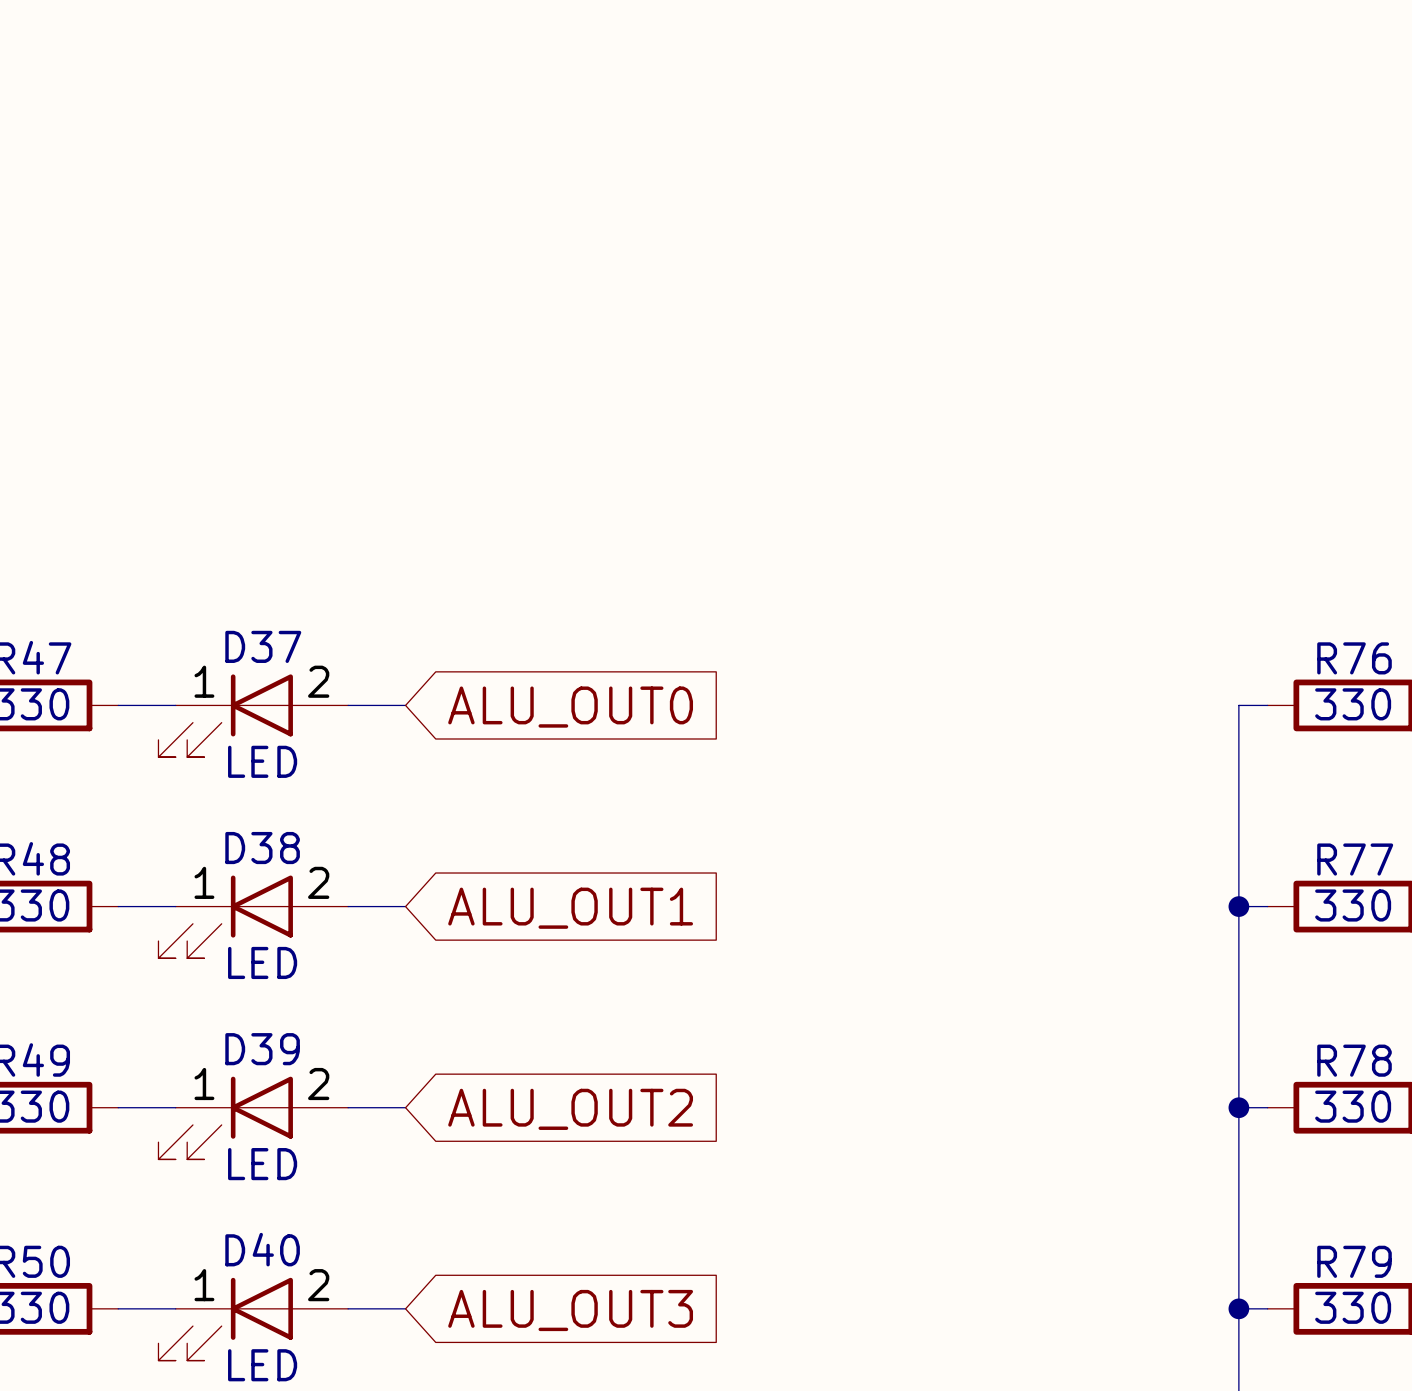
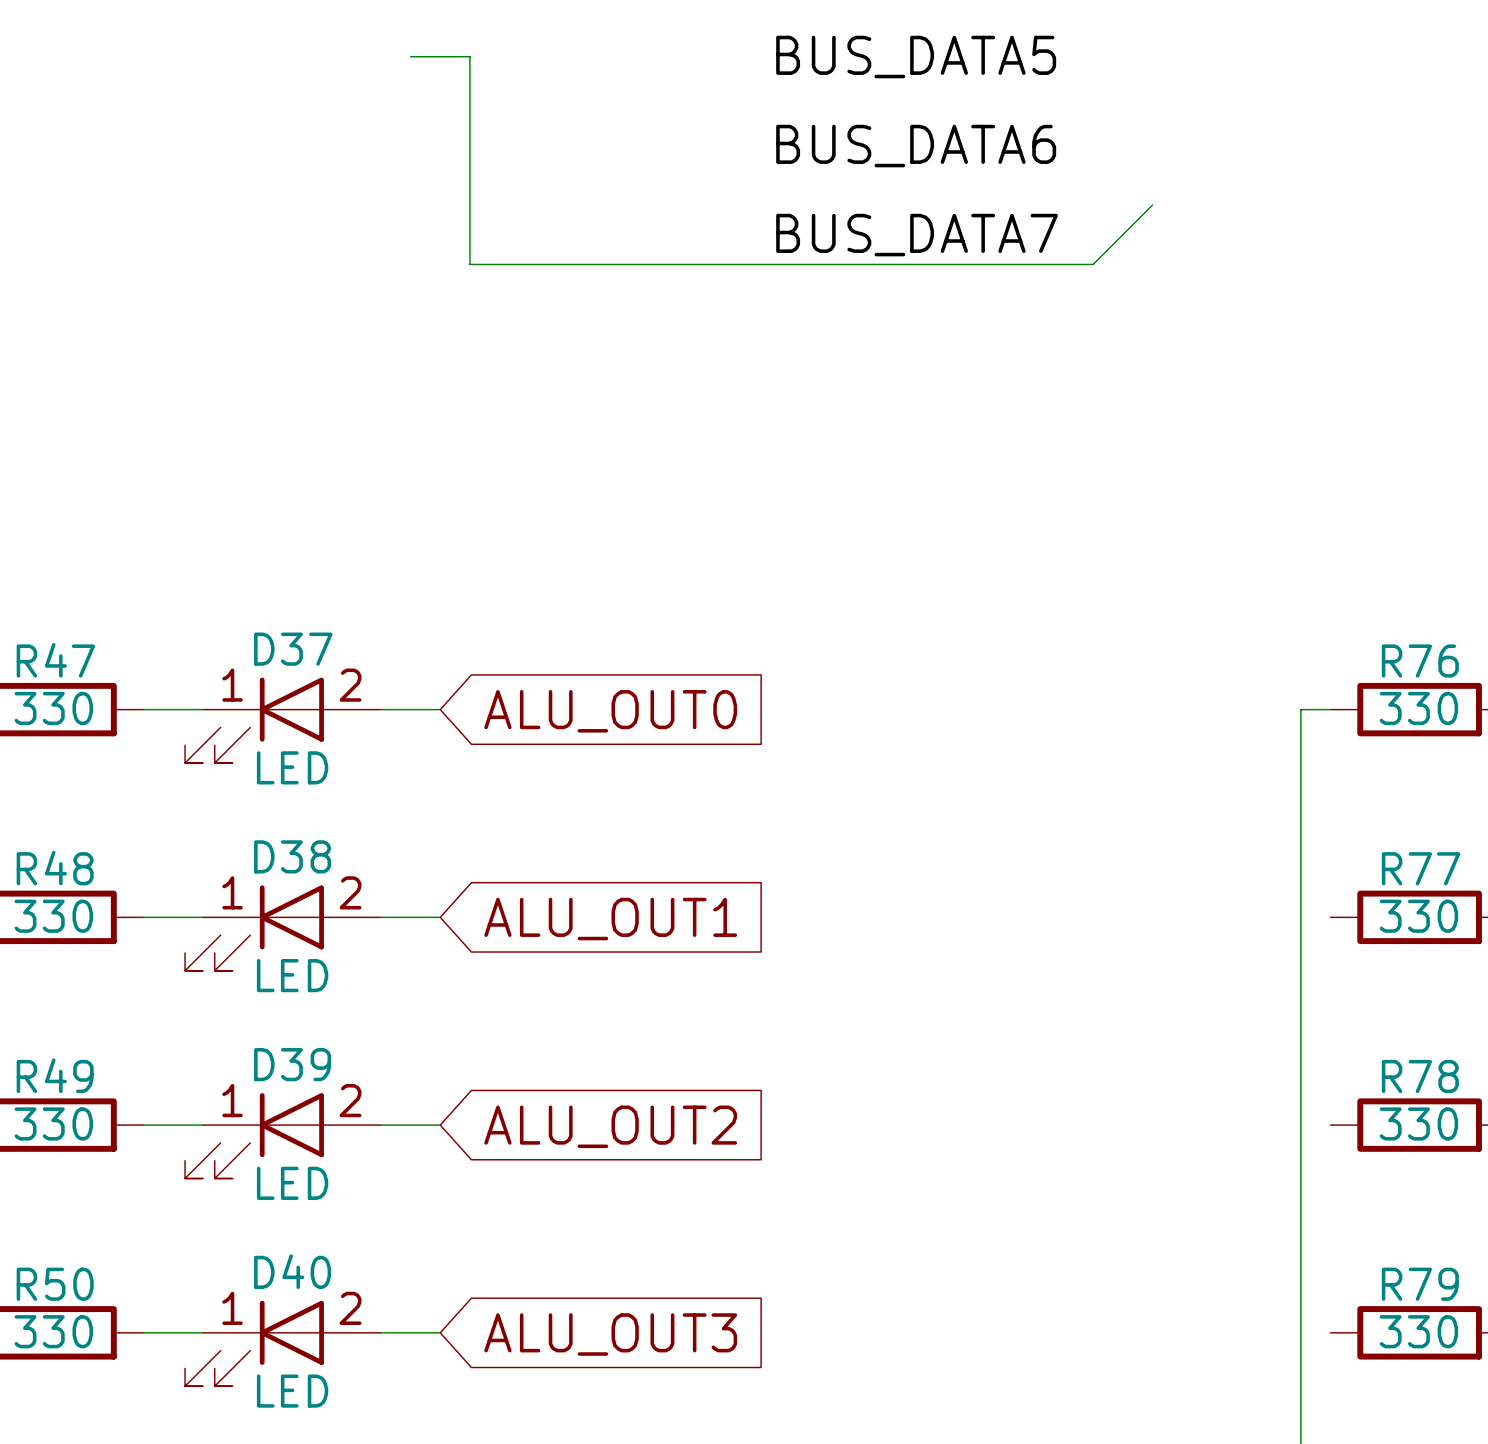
wire: none -> (410, 56) (469, 56) (469, 264) (1093, 264) (1152, 205)
label: none -> BUS_DATA5 (916, 57)
label: none -> BUS_DATA6 (916, 146)
label: none -> BUS_DATA7 (917, 235)
wire: (1238, 906) (1267, 906) -> none
junction: (1238, 906) -> none
wire: (1238, 1107) (1267, 1107) -> none
junction: (1238, 1107) -> none
wire: (1238, 1308) (1267, 1308) -> none
junction: (1238, 1308) -> none

